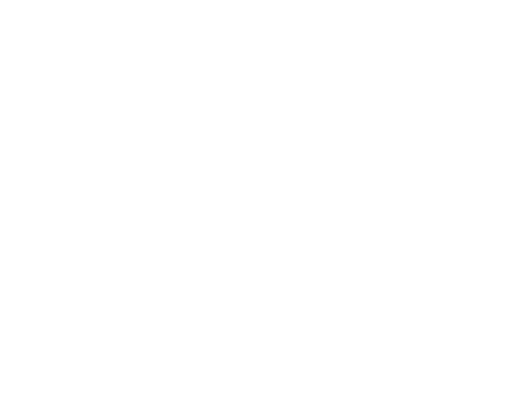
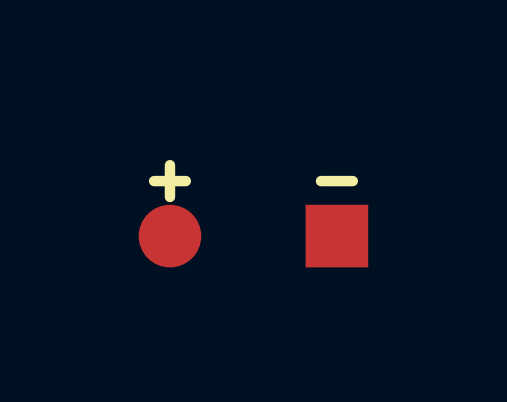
part: none -> (253, 236)

